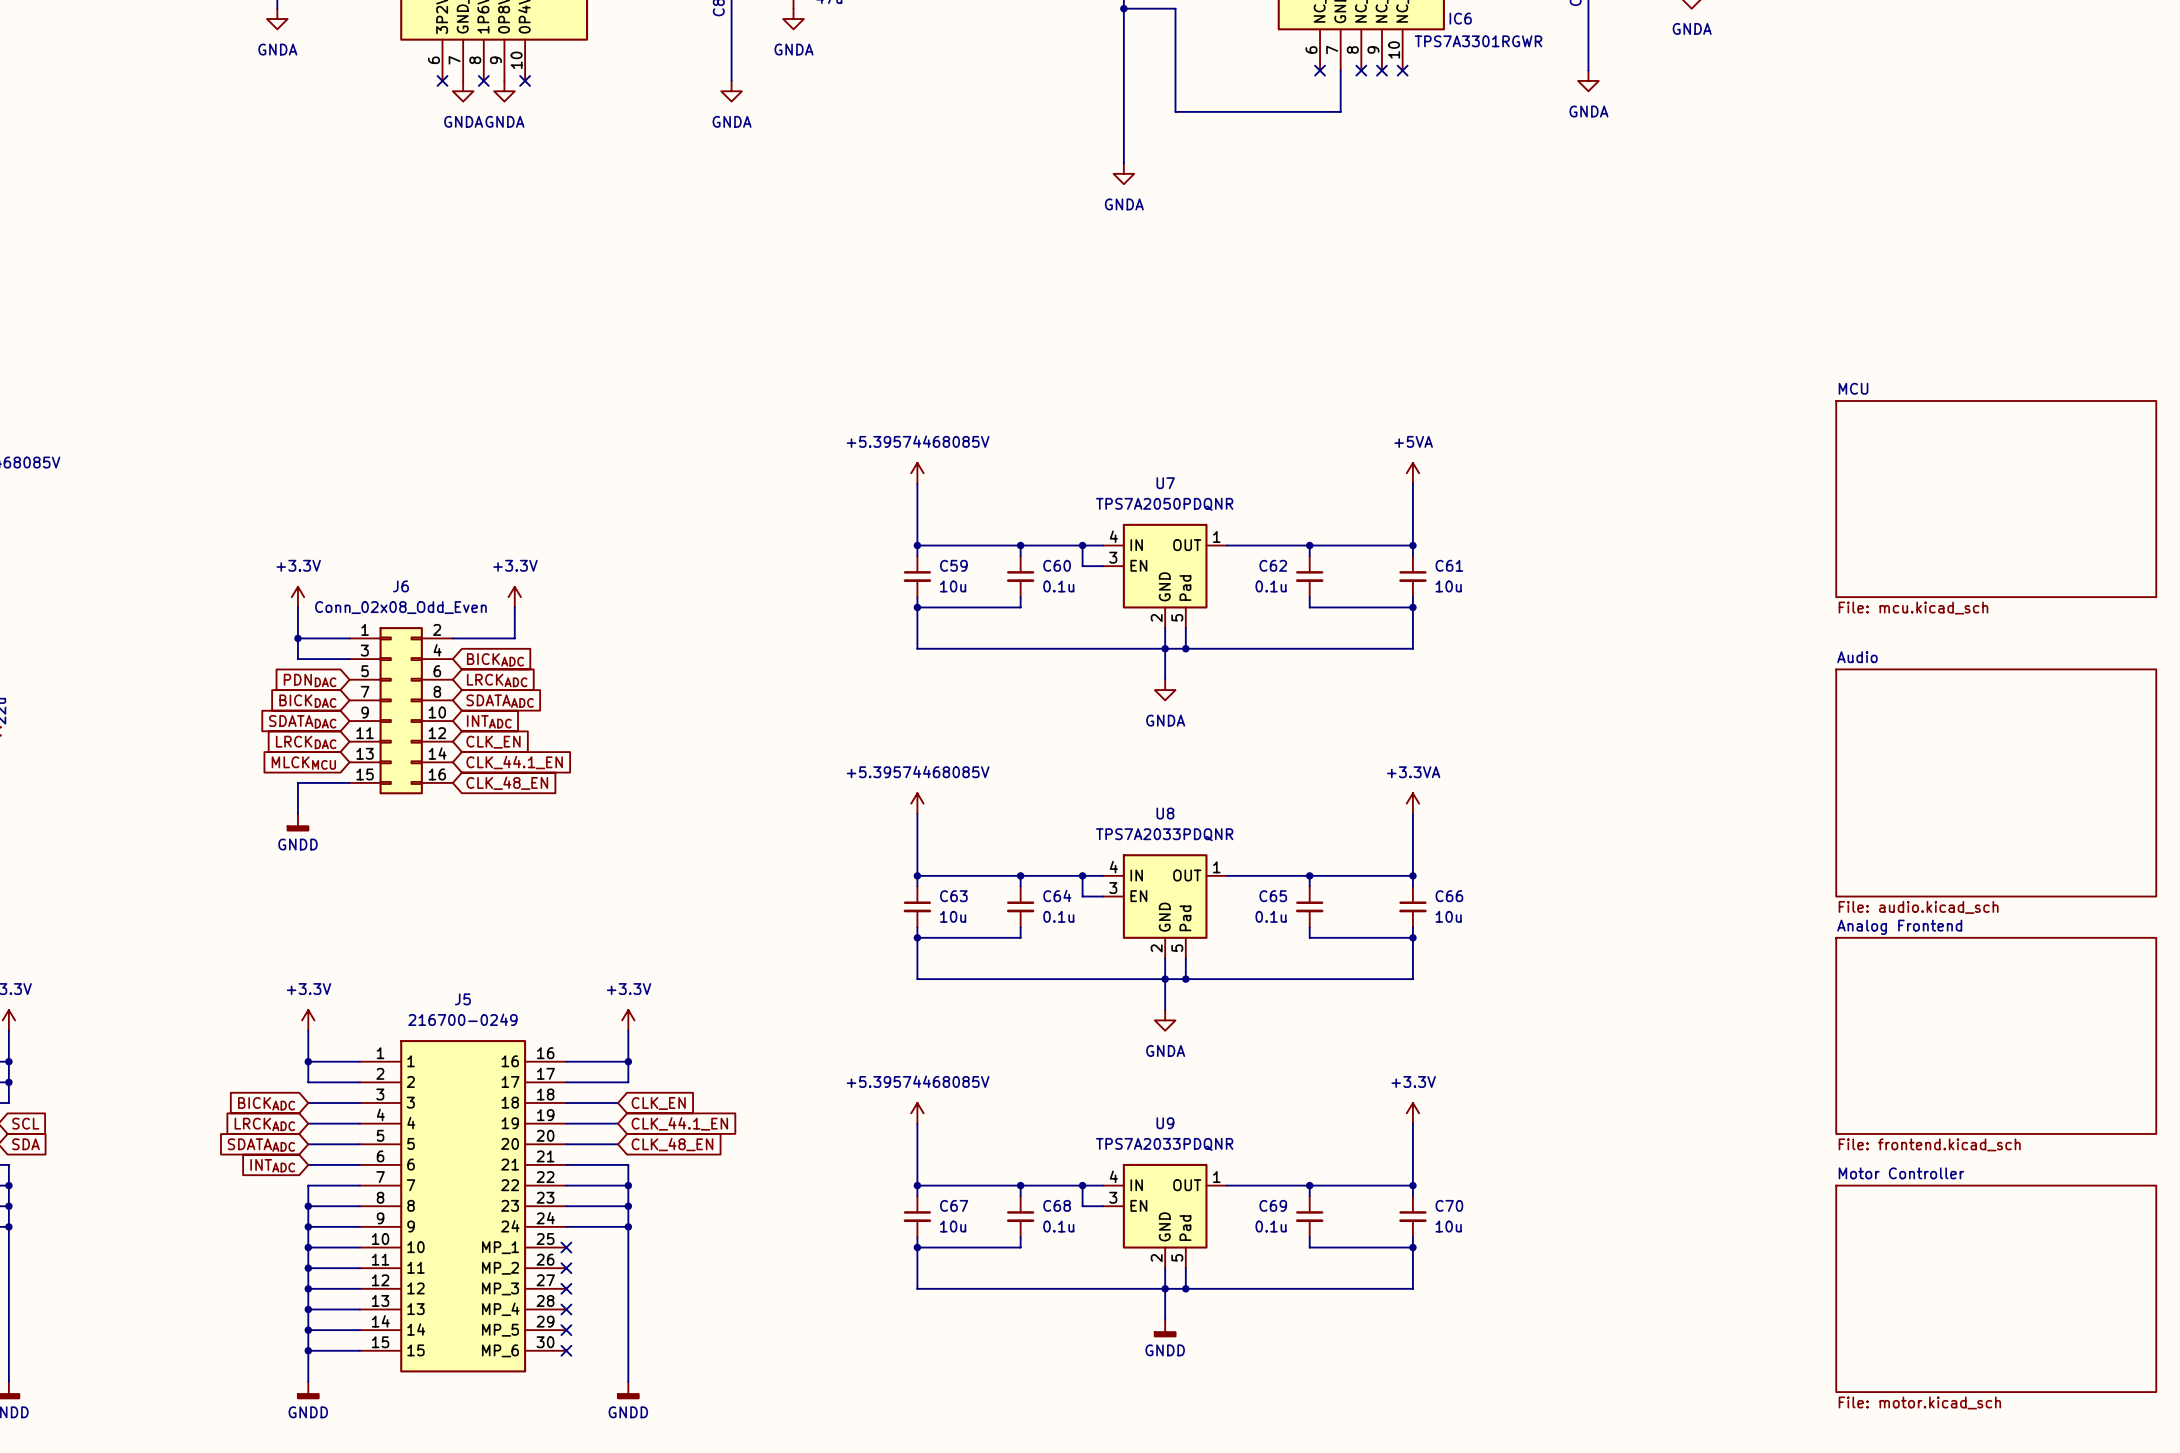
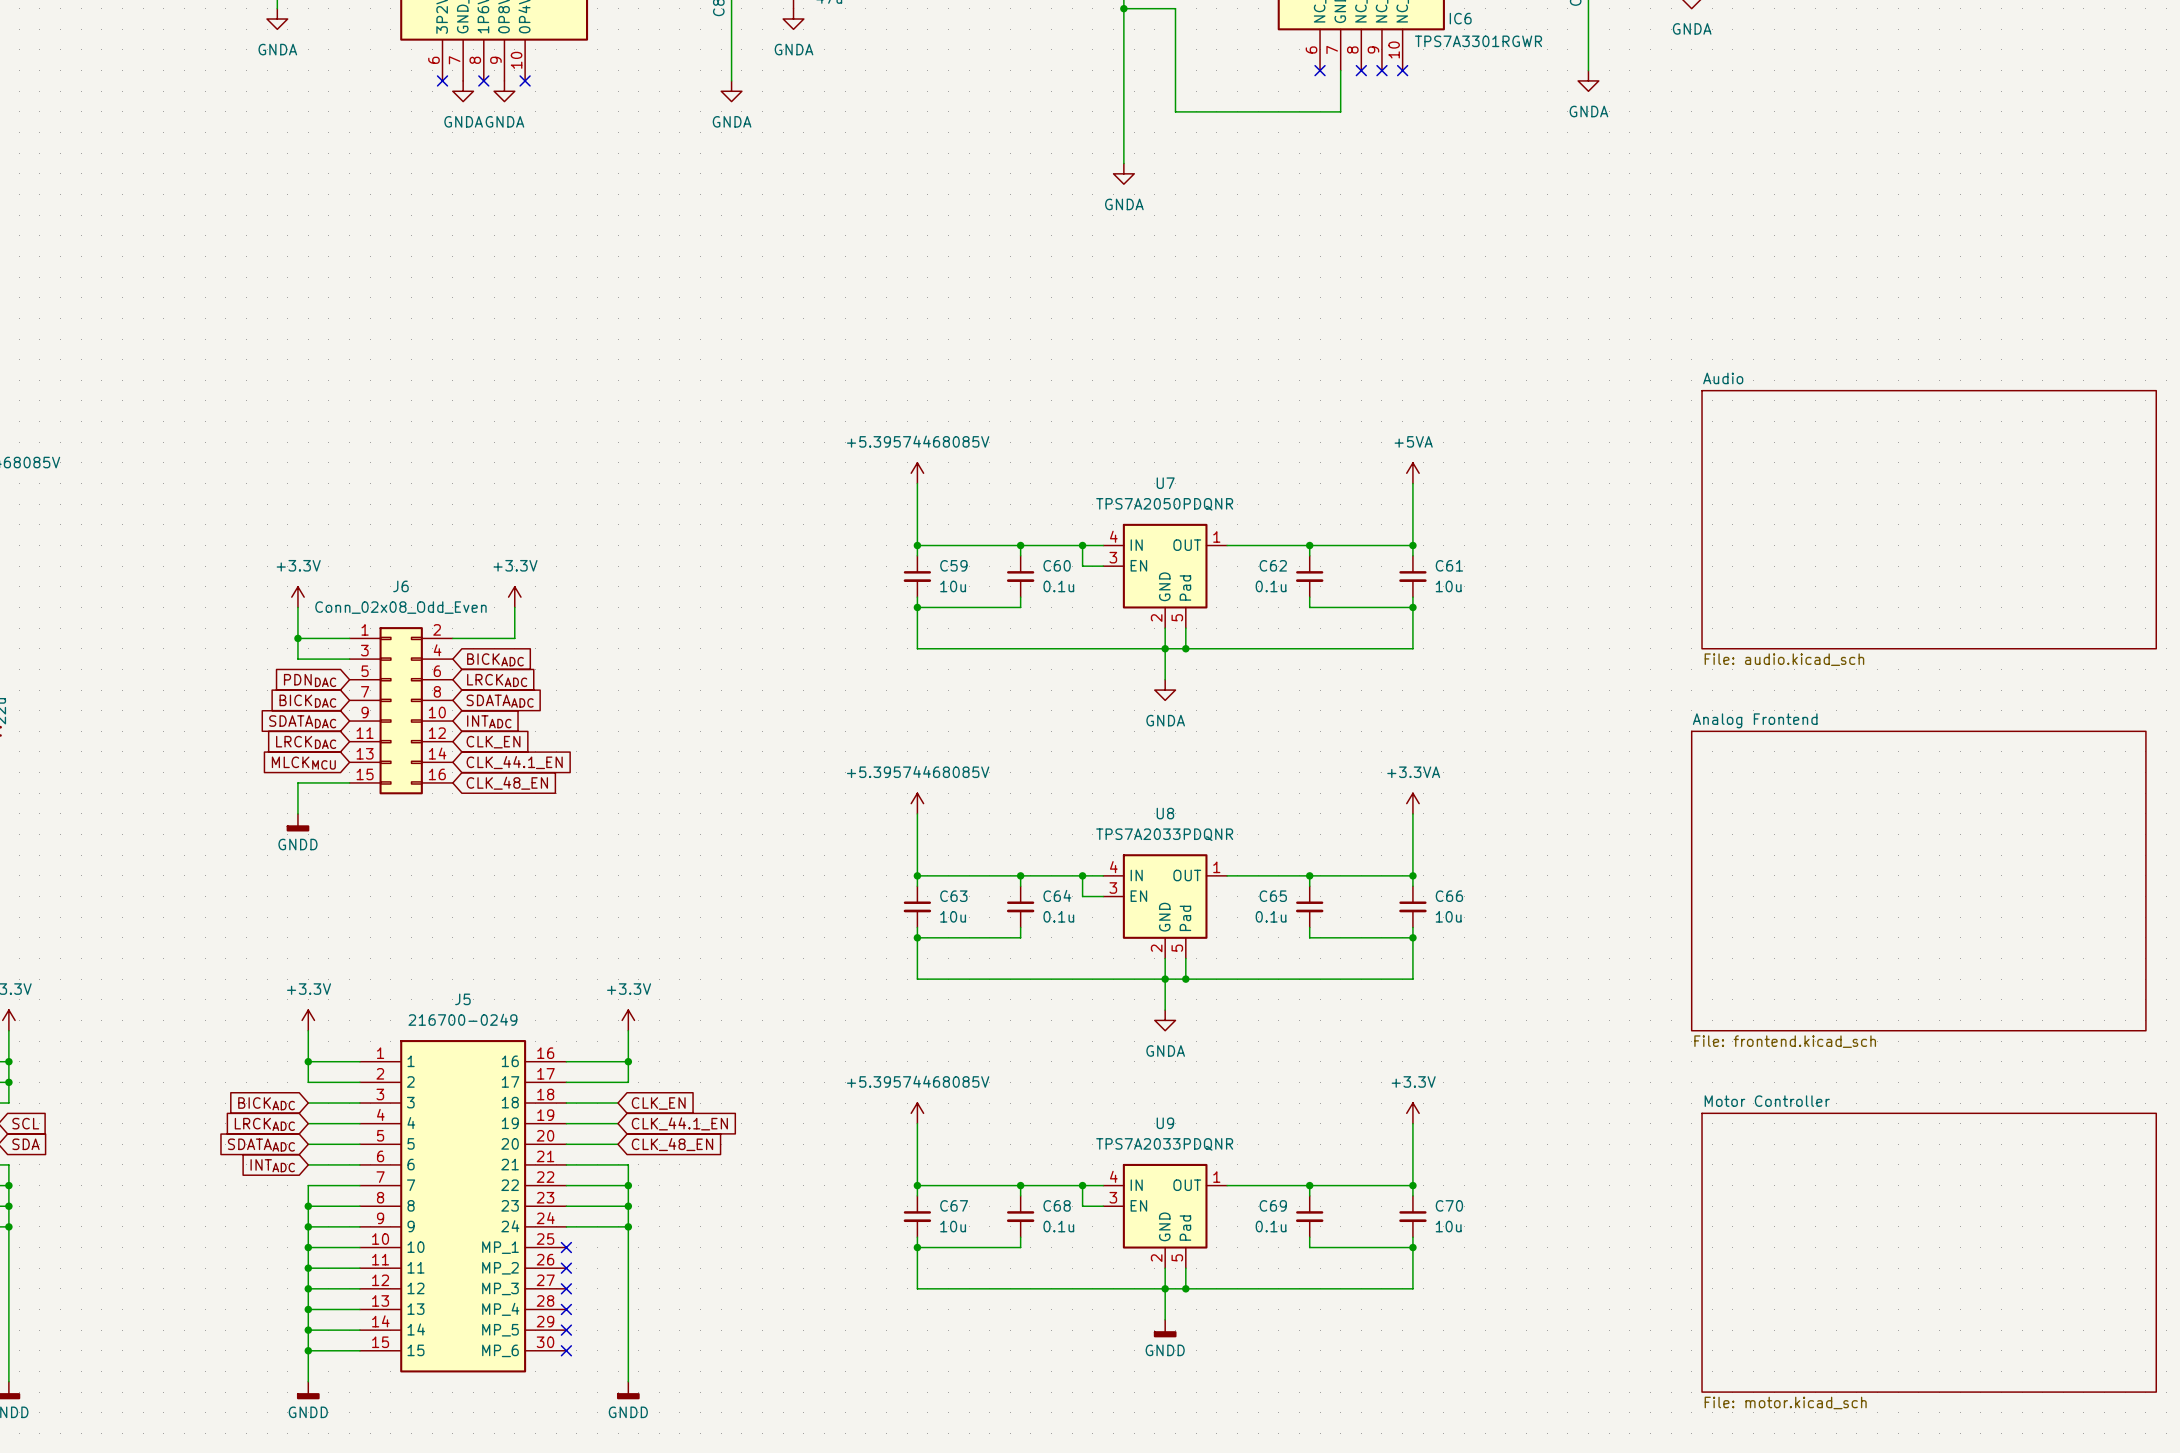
sheet MCU: File: mcu.kicad_sch (1996, 499) -> none
sheet Audio: none -> File: audio.kicad_sch (1929, 519)
sheet Audio: File: audio.kicad_sch (1996, 782) -> none
sheet Analog Frontend: none -> File: frontend.kicad_sch (1918, 881)
sheet Analog Frontend: File: frontend.kicad_sch (1996, 1035) -> none
sheet Motor Controller: none -> File: motor.kicad_sch (1929, 1252)
sheet Motor Controller: File: motor.kicad_sch (1996, 1288) -> none

